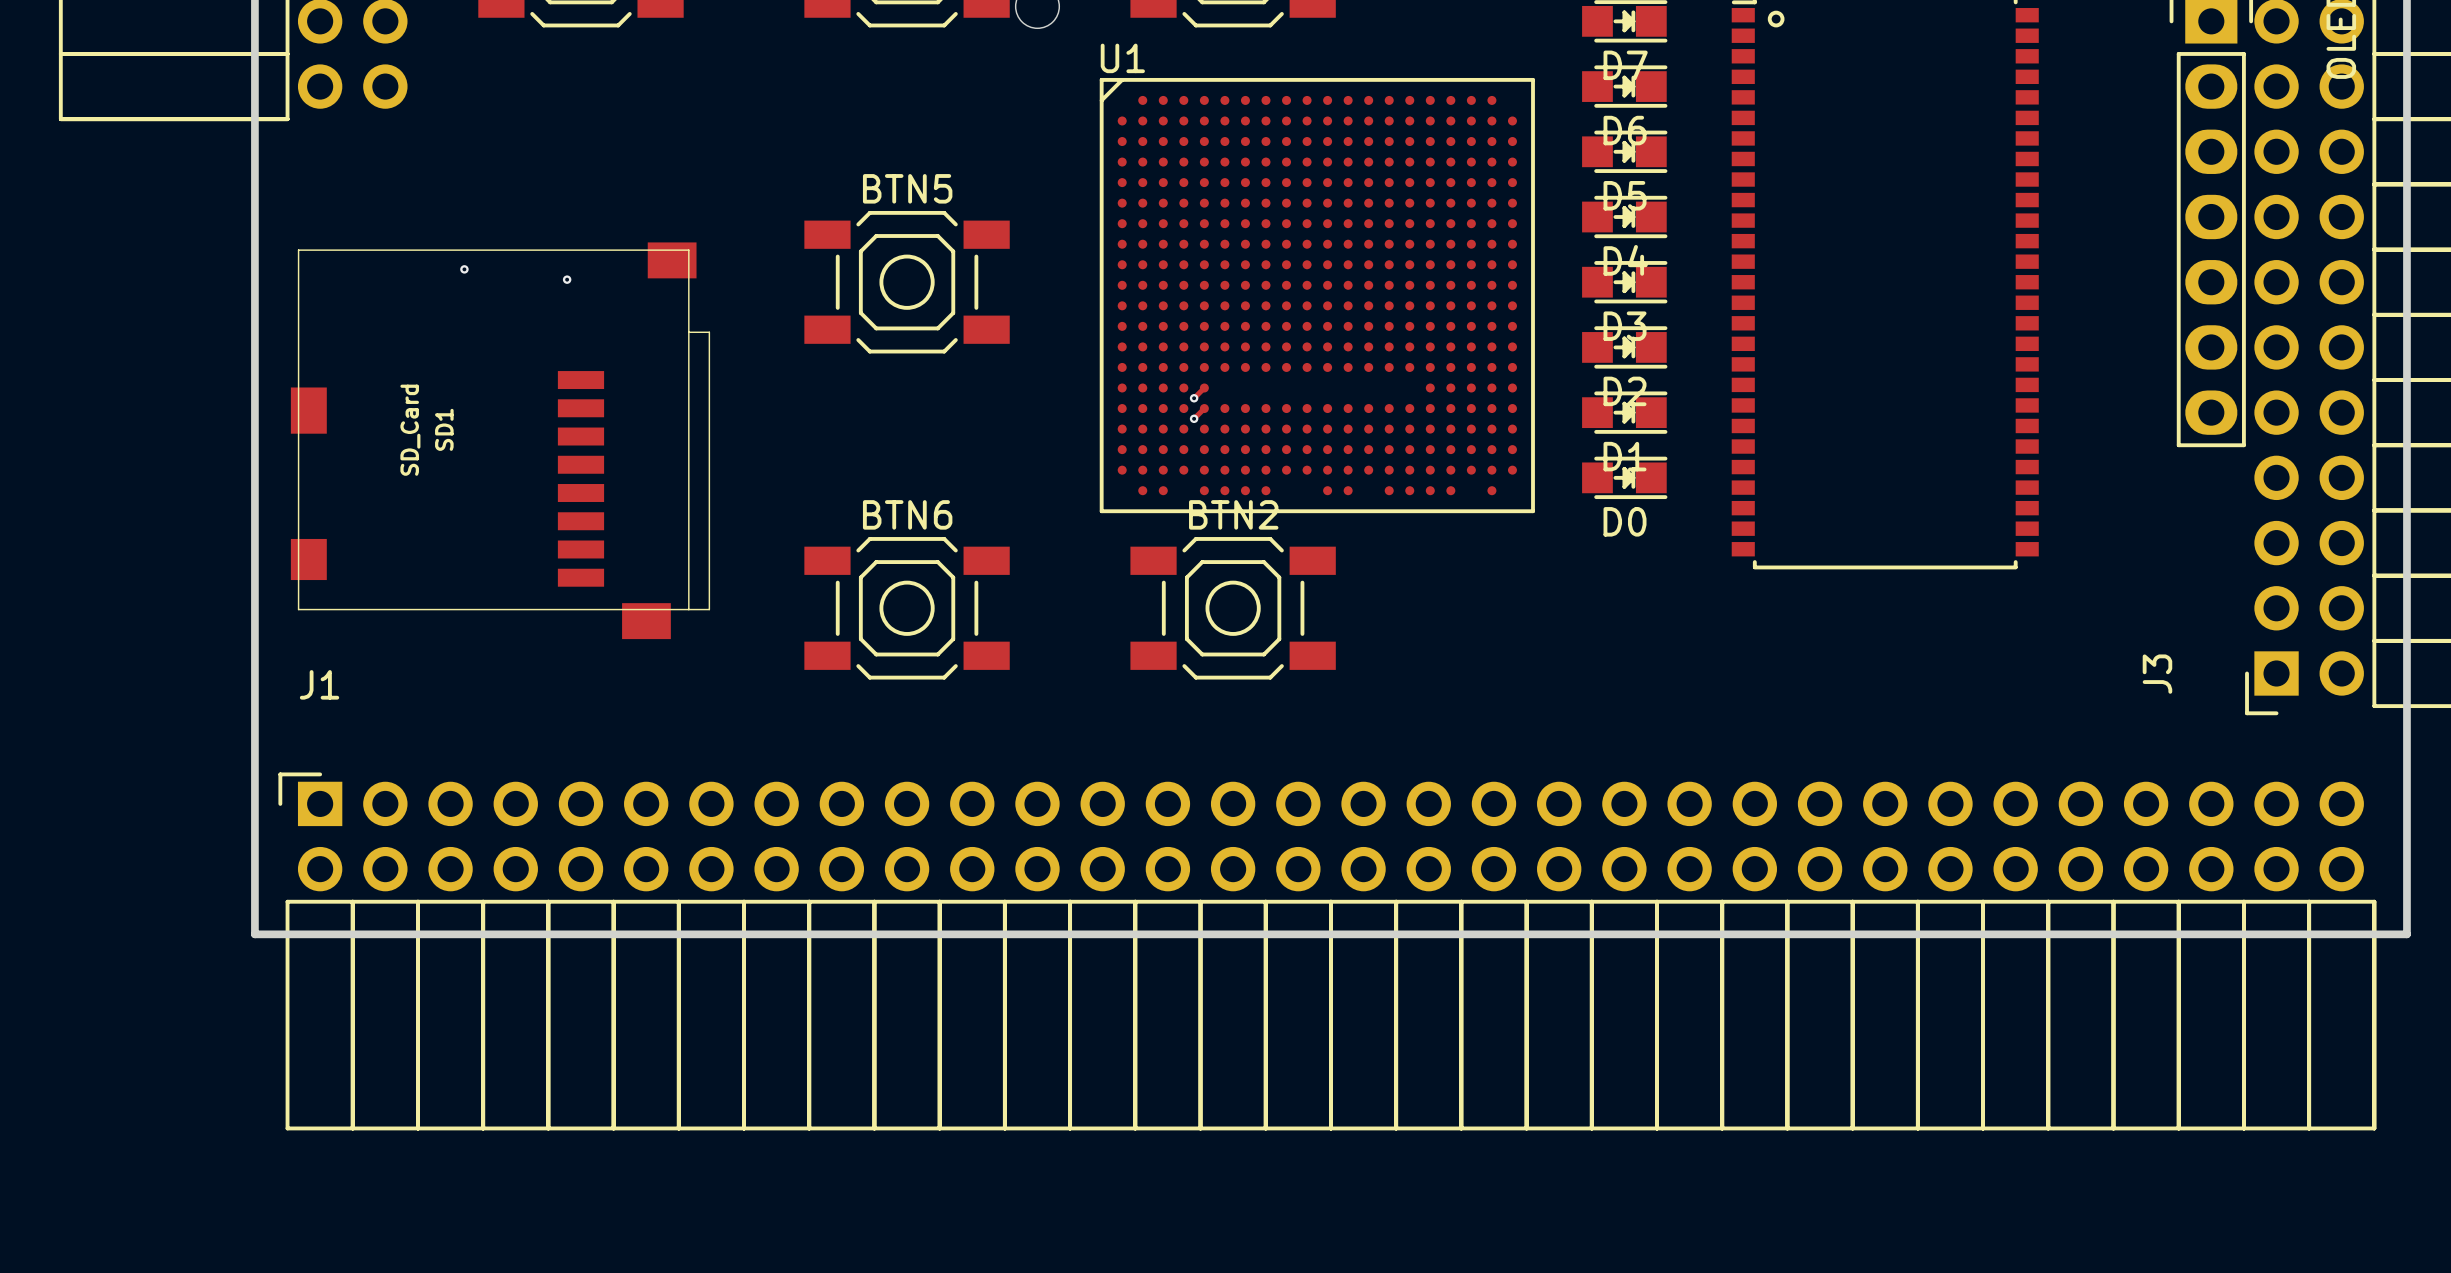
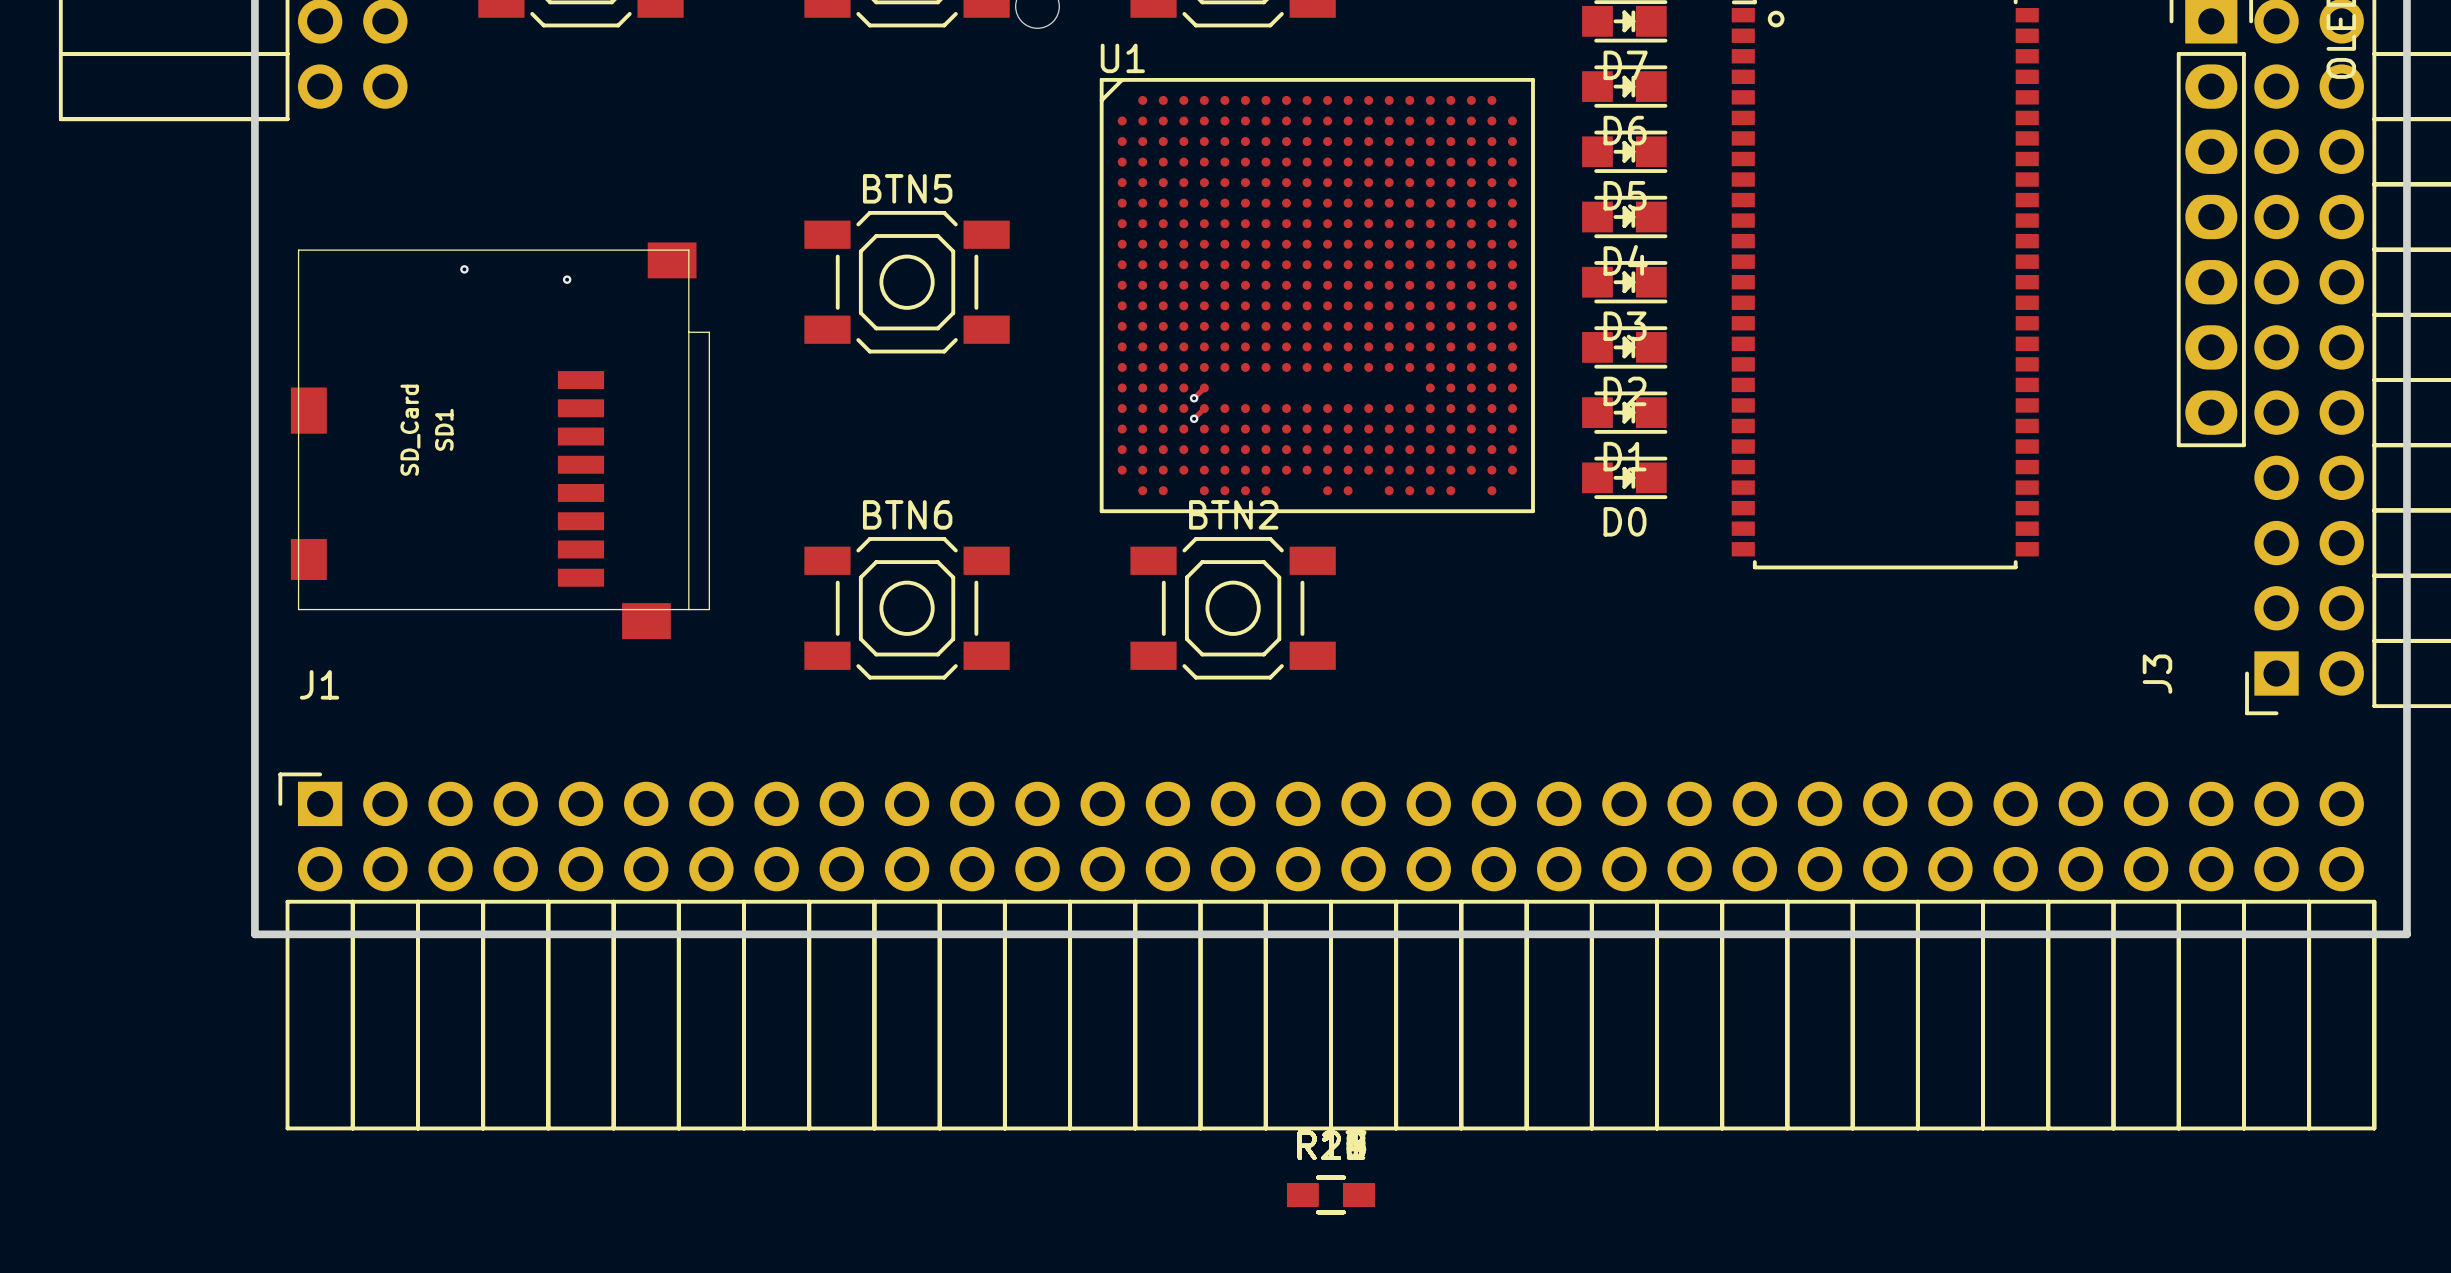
part: none -> (1330, 1194)
part: none -> (1330, 1194)
part: none -> (1330, 1194)
part: none -> (1330, 1194)
part: none -> (1330, 1194)
part: none -> (1330, 1194)
part: none -> (1330, 1194)
part: none -> (1330, 1194)

